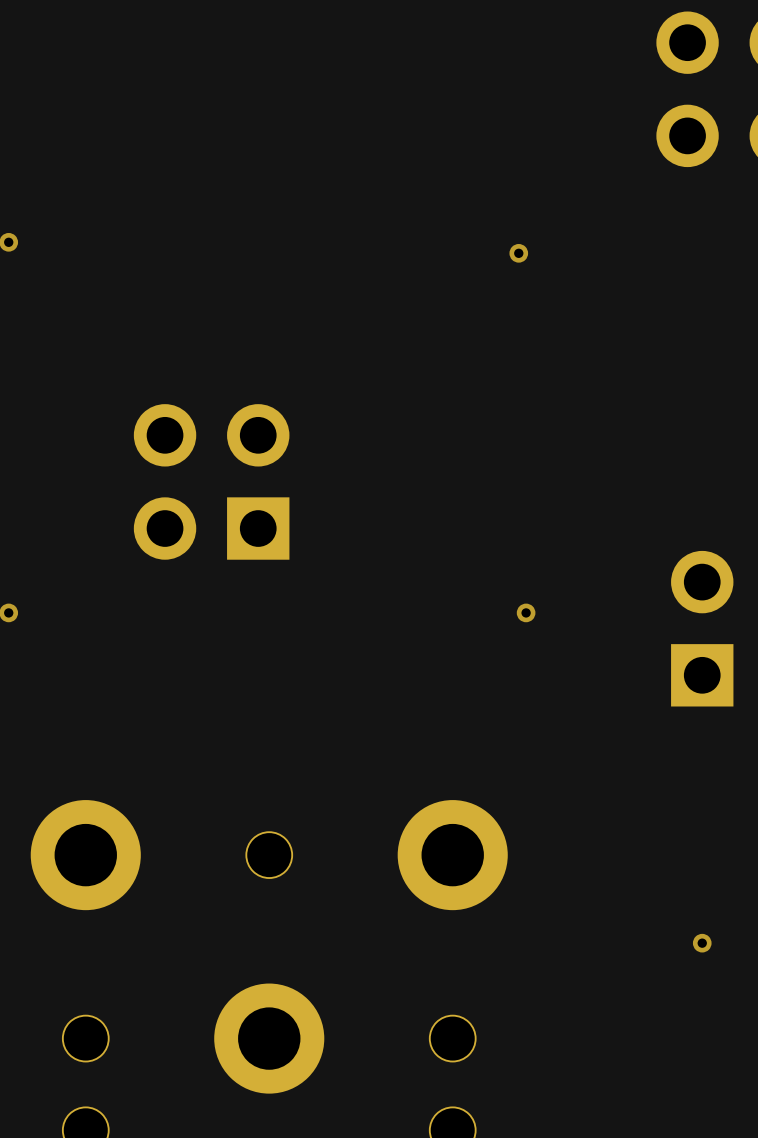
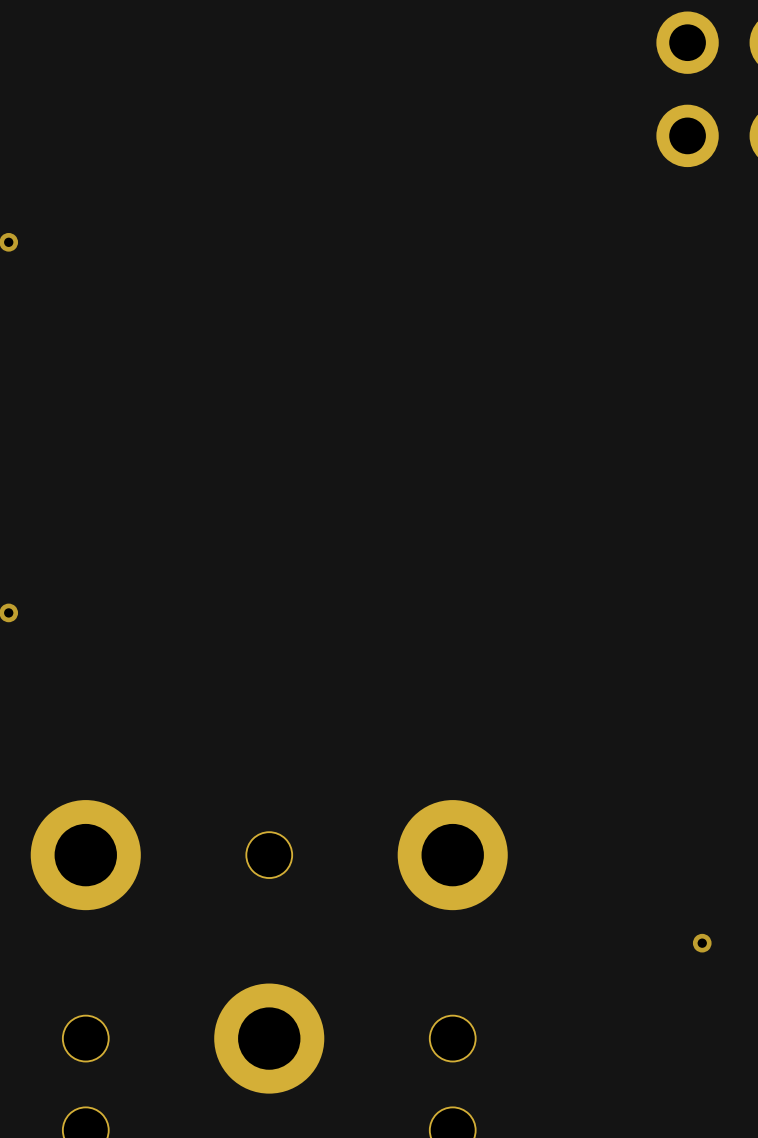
via: (518, 253) -> none
part: (211, 481) -> none
via: (526, 612) -> none
part: (702, 628) -> none

